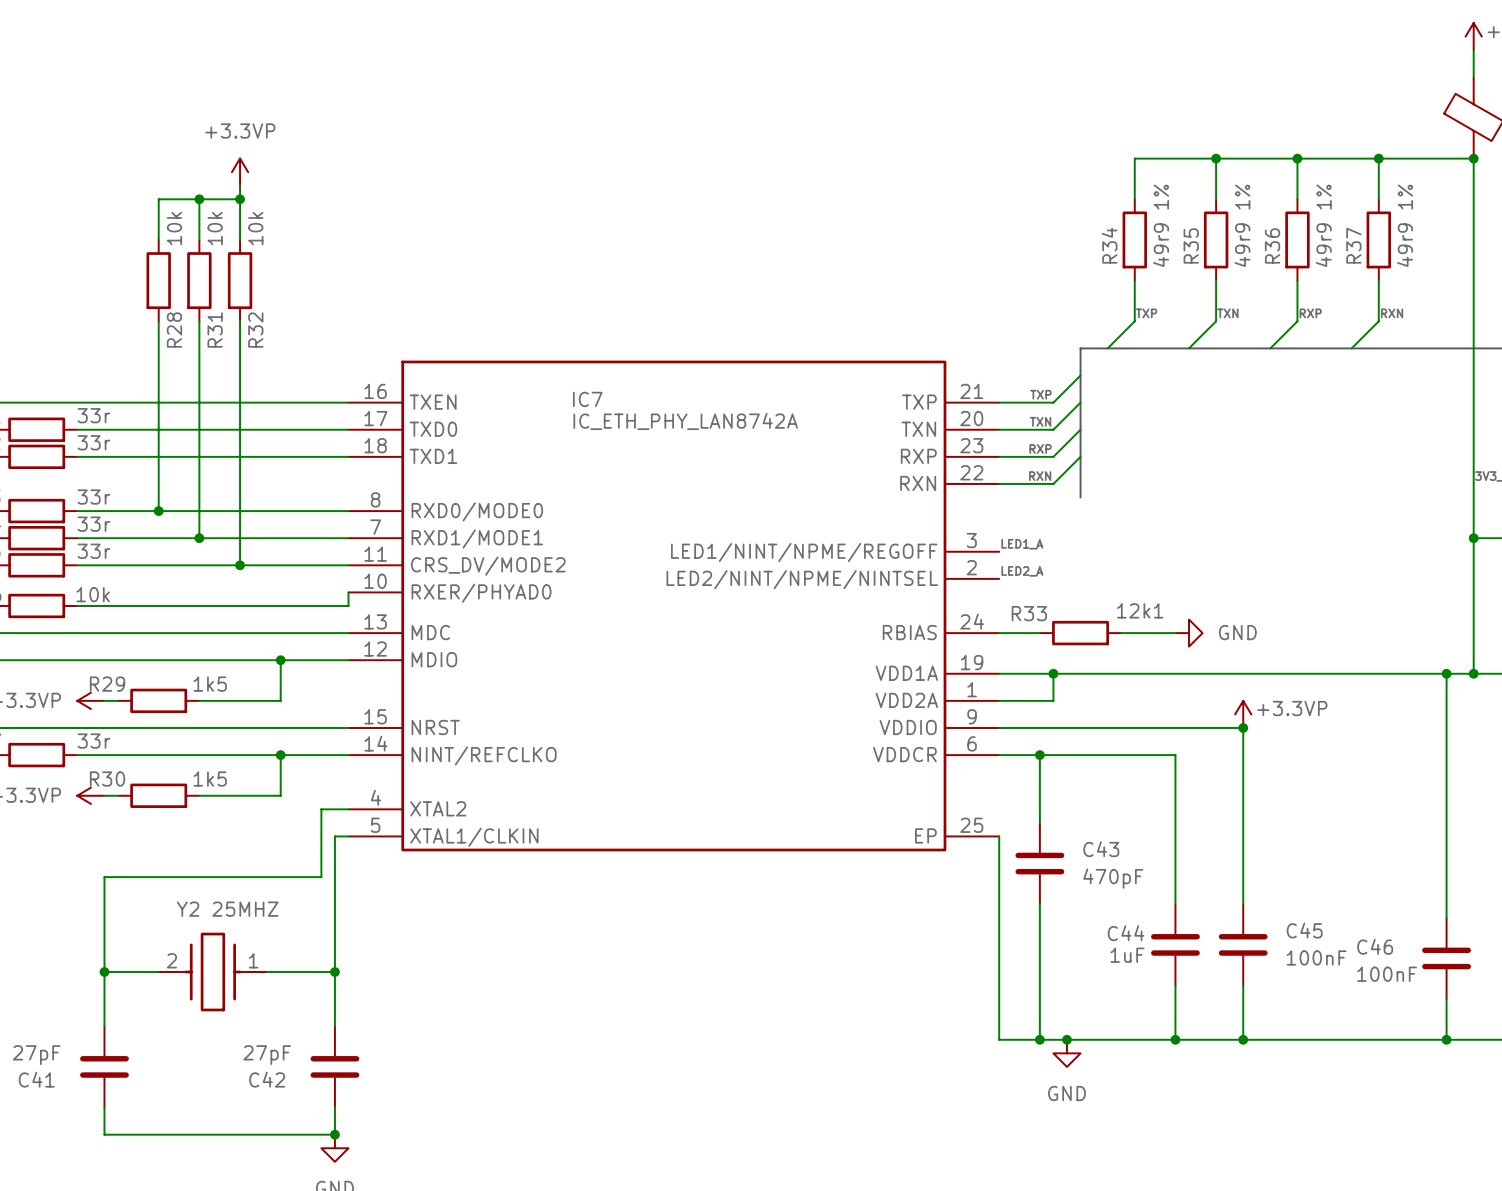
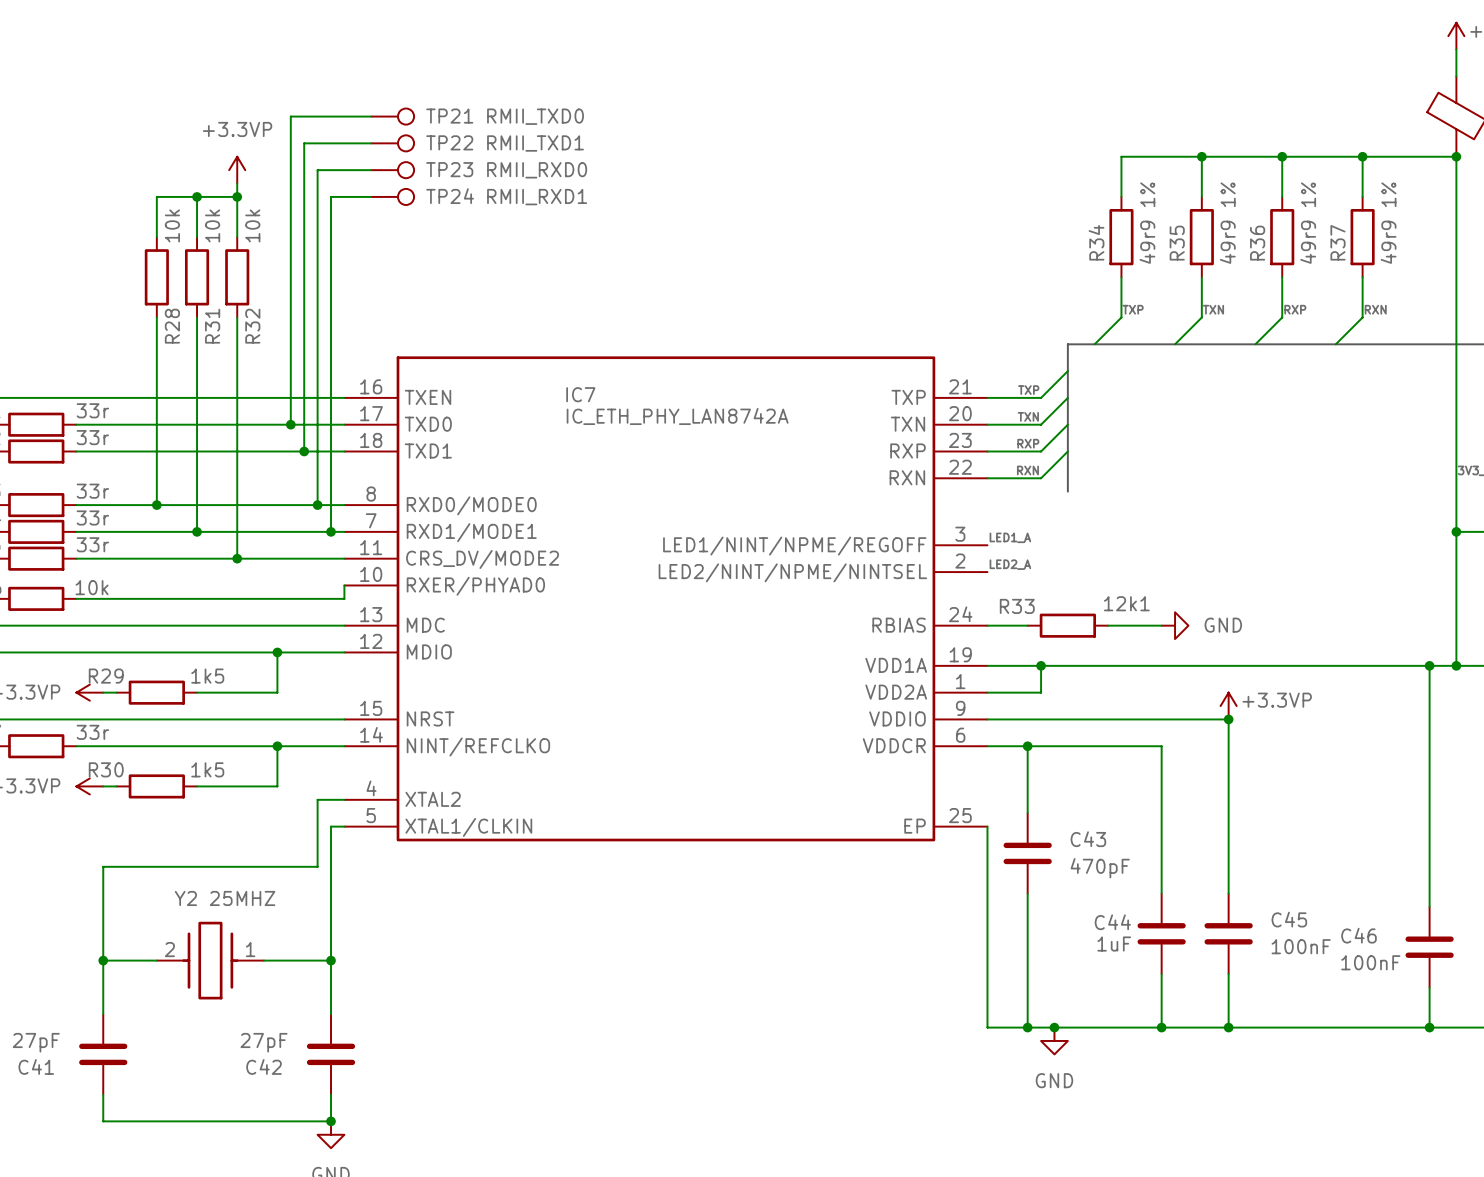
wire: none -> (371, 116) (290, 116) (290, 424)
TP21: none -> RMII_TXD0 (392, 116)
wire: none -> (371, 143) (304, 143) (304, 451)
TP22: none -> RMII_TXD1 (392, 143)
wire: none -> (371, 170) (317, 170) (317, 505)
TP23: none -> RMII_RXD0 (392, 170)
wire: none -> (371, 196) (331, 196) (331, 531)
TP24: none -> RMII_RXD1 (392, 196)
junction: none -> (290, 424)
junction: none -> (304, 451)
junction: none -> (317, 505)
junction: none -> (331, 531)

